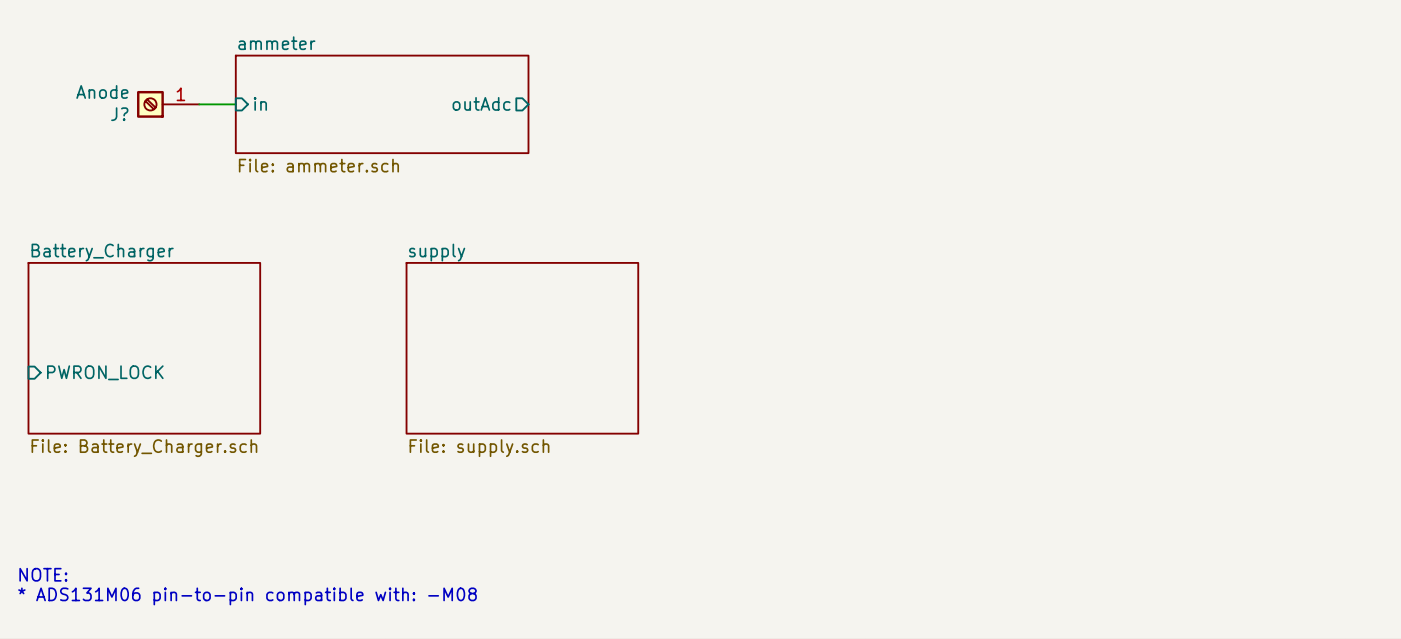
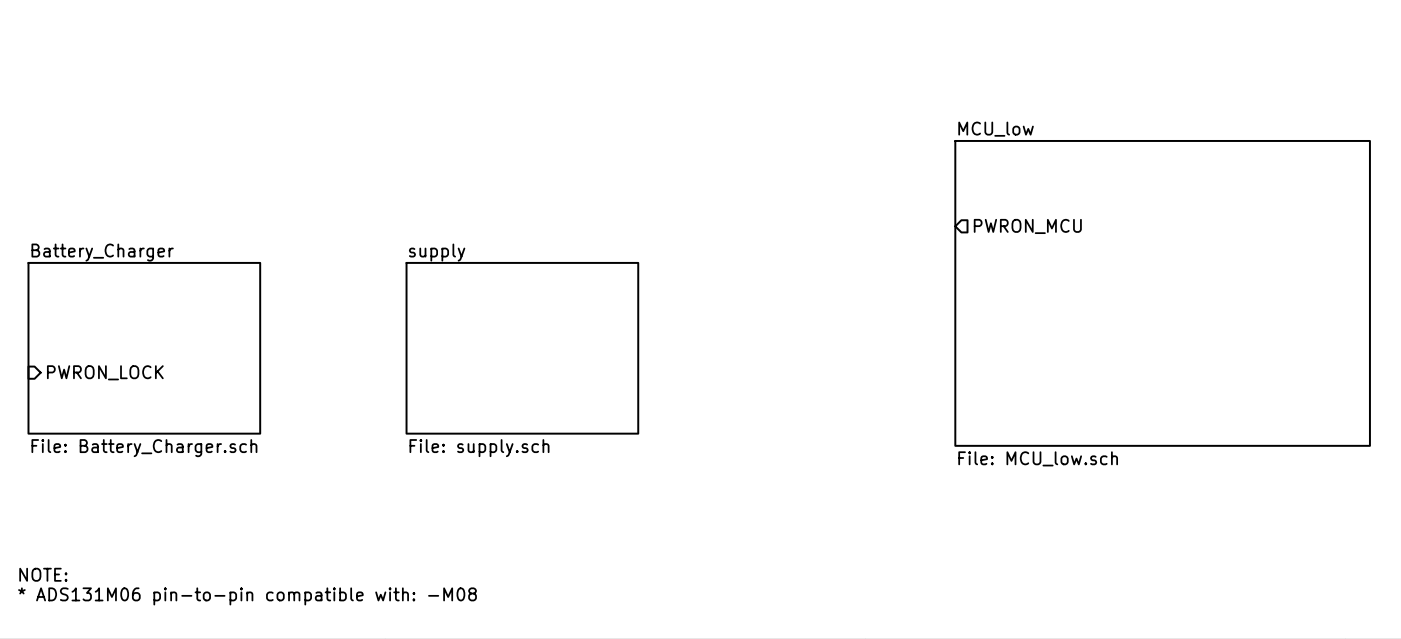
sheet pin: in (260, 103) -> none
sheet pin: outAdc (481, 103) -> none
J?: Anode (168, 104) -> none
wire: (199, 104) (235, 104) -> none
sheet ammeter: File: ammeter.sch (382, 104) -> none
sheet pin: none -> PWRON_MCU (1027, 226)
sheet MCU_low: none -> File: MCU_low.sch (1162, 293)

